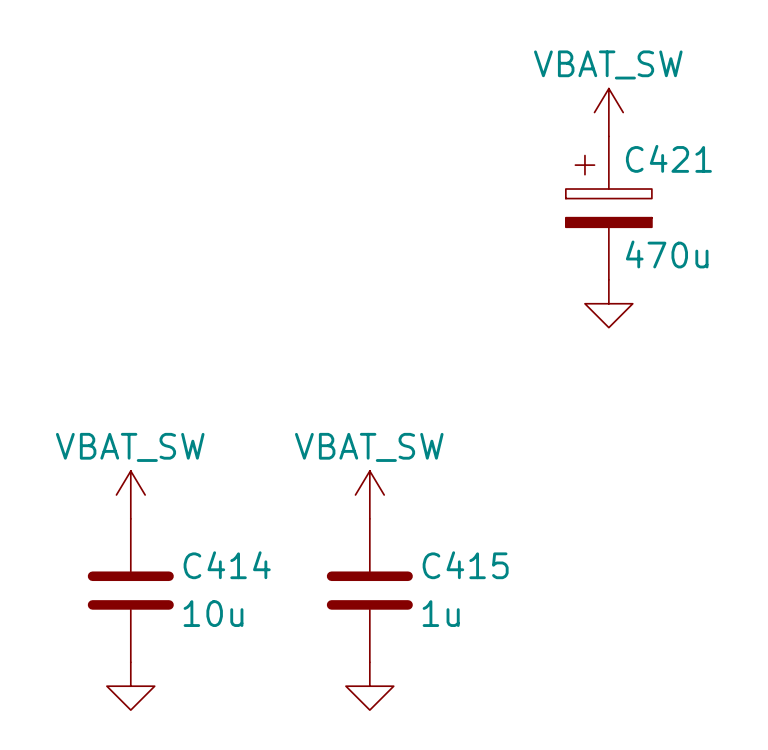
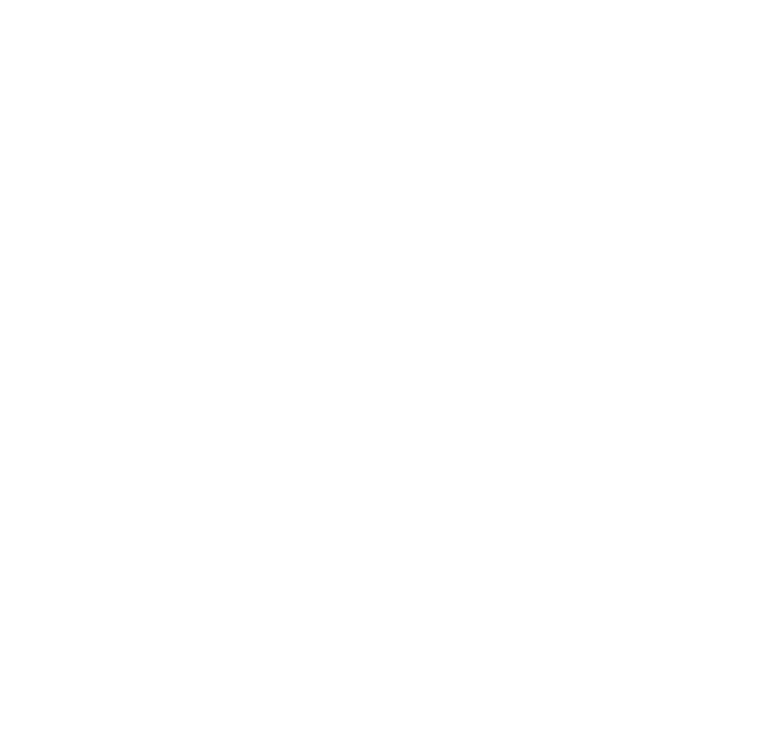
power symbol: VBAT_SW (608, 112) -> none
C421: 470u (608, 208) -> none
power symbol: (608, 303) -> none
power symbol: VBAT_SW (130, 494) -> none
power symbol: VBAT_SW (369, 494) -> none
C414: 10u (130, 590) -> none
C415: 1u (369, 590) -> none
power symbol: (130, 686) -> none
power symbol: (369, 686) -> none

